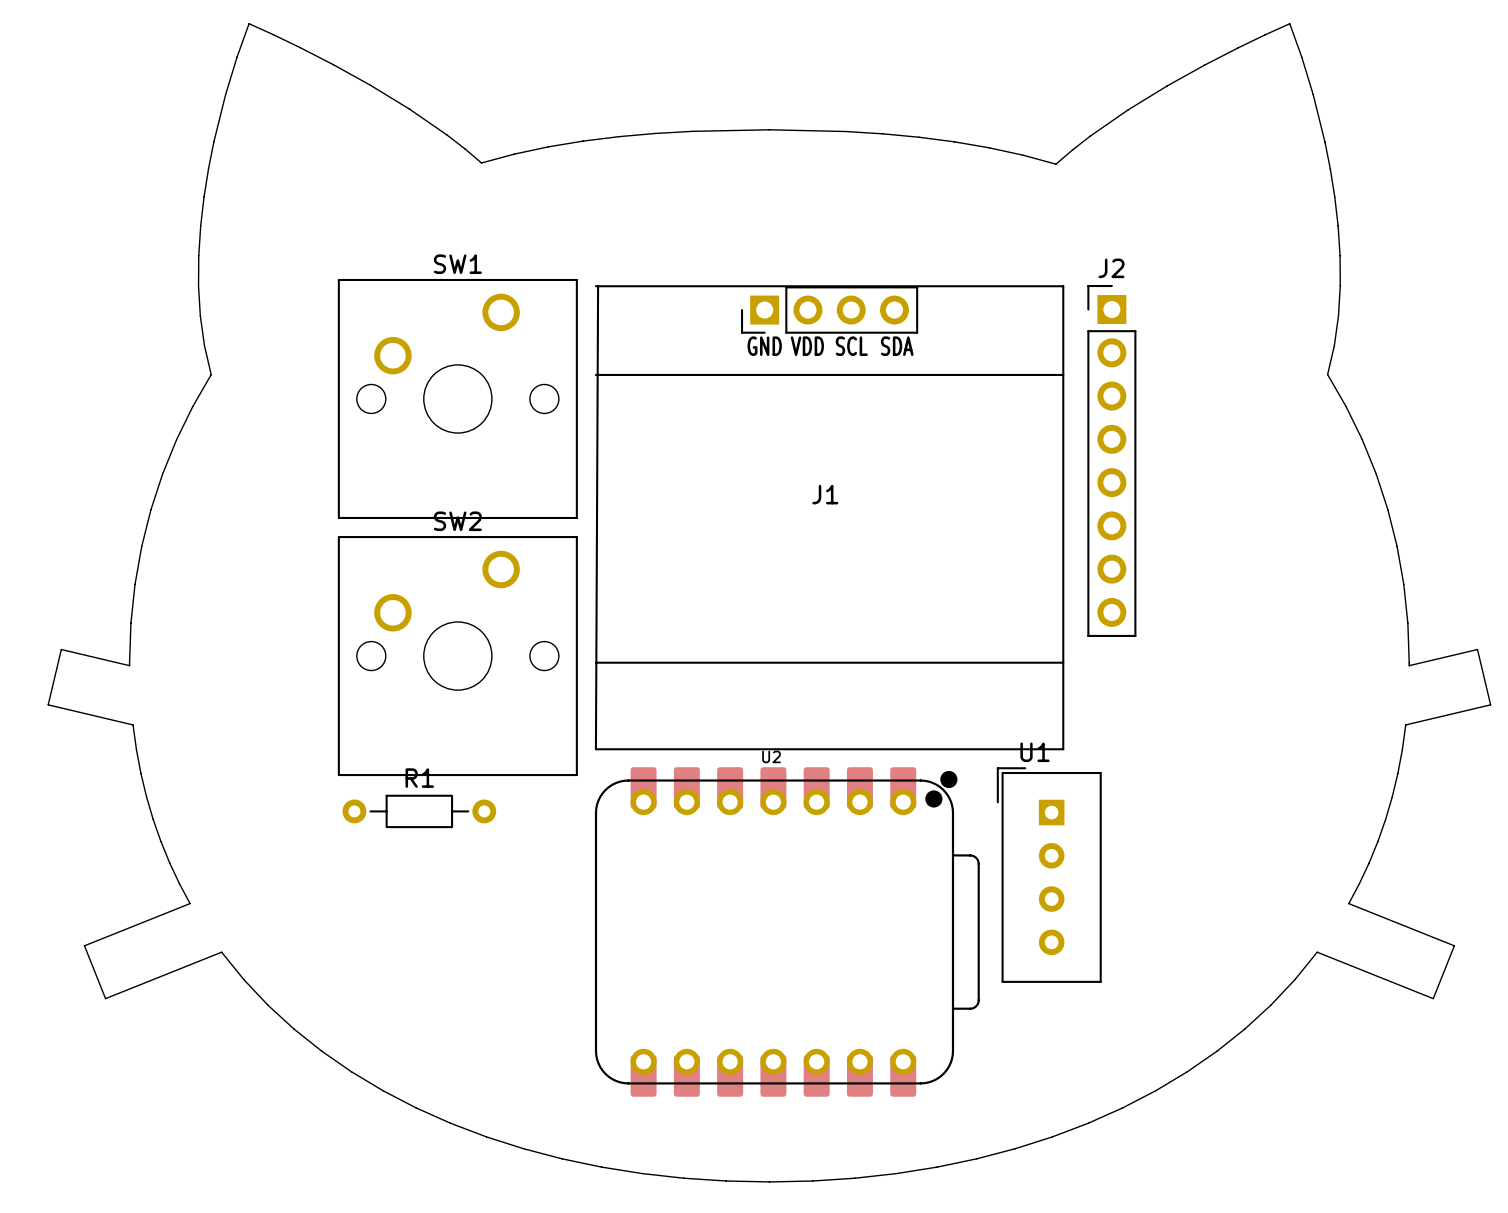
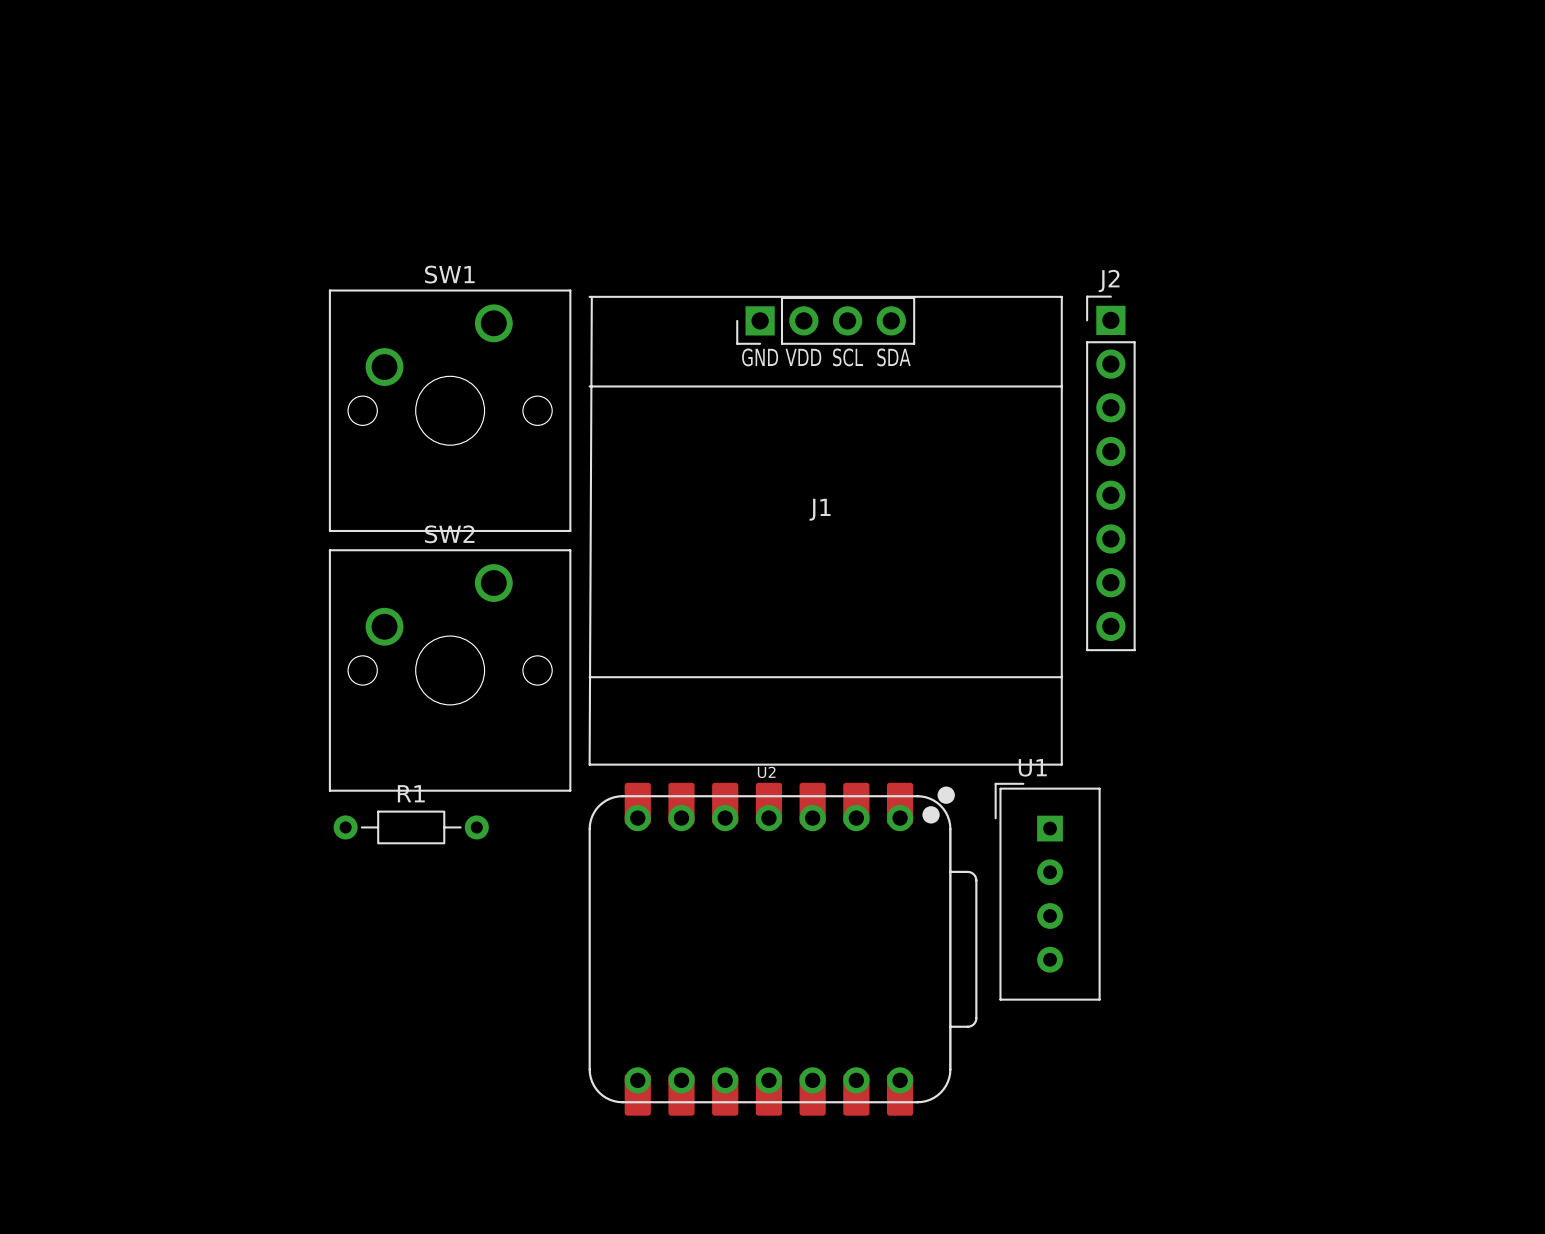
board edge: (249, 23) (225, 94) (213, 142) (200, 225) (198, 285) (200, 315) (211, 374) (176, 439) (150, 509) (135, 584) (130, 623) (129, 665) (61, 649) (48, 704) (133, 724) (140, 773) (153, 819) (169, 862) (190, 903) (84, 945) (105, 998) (221, 952) (267, 1005) (321, 1051) (382, 1090) (450, 1123) (523, 1148) (601, 1167) (683, 1178) (769, 1181) (855, 1178) (937, 1167) (1015, 1148) (1088, 1123) (1155, 1090) (1216, 1051) (1270, 1005) (1317, 952) (1433, 998) (1454, 945) (1348, 903) (1369, 862) (1385, 819) (1397, 773) (1405, 724) (1490, 704) (1477, 649) (1409, 665) (1403, 584) (1387, 509) (1362, 439) (1327, 374) (1338, 315) (1340, 285) (1338, 225) (1325, 142) (1313, 94) (1289, 23) (1238, 47) (1167, 85) (1090, 136) (1055, 164) (989, 147) (919, 137) (845, 131) (769, 129) (692, 131) (619, 136) (548, 146) (481, 162) (447, 135) (370, 85) (300, 47) (249, 23) -> none

